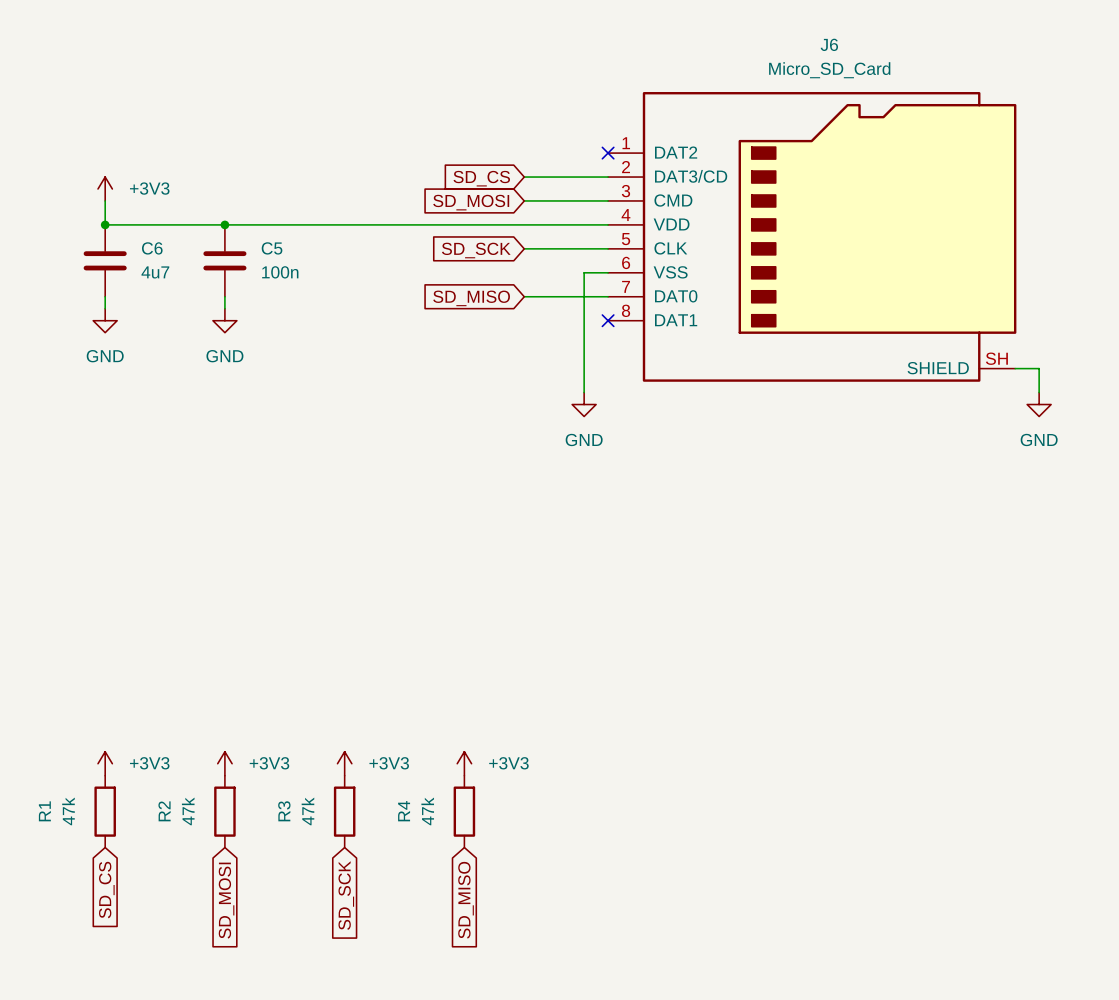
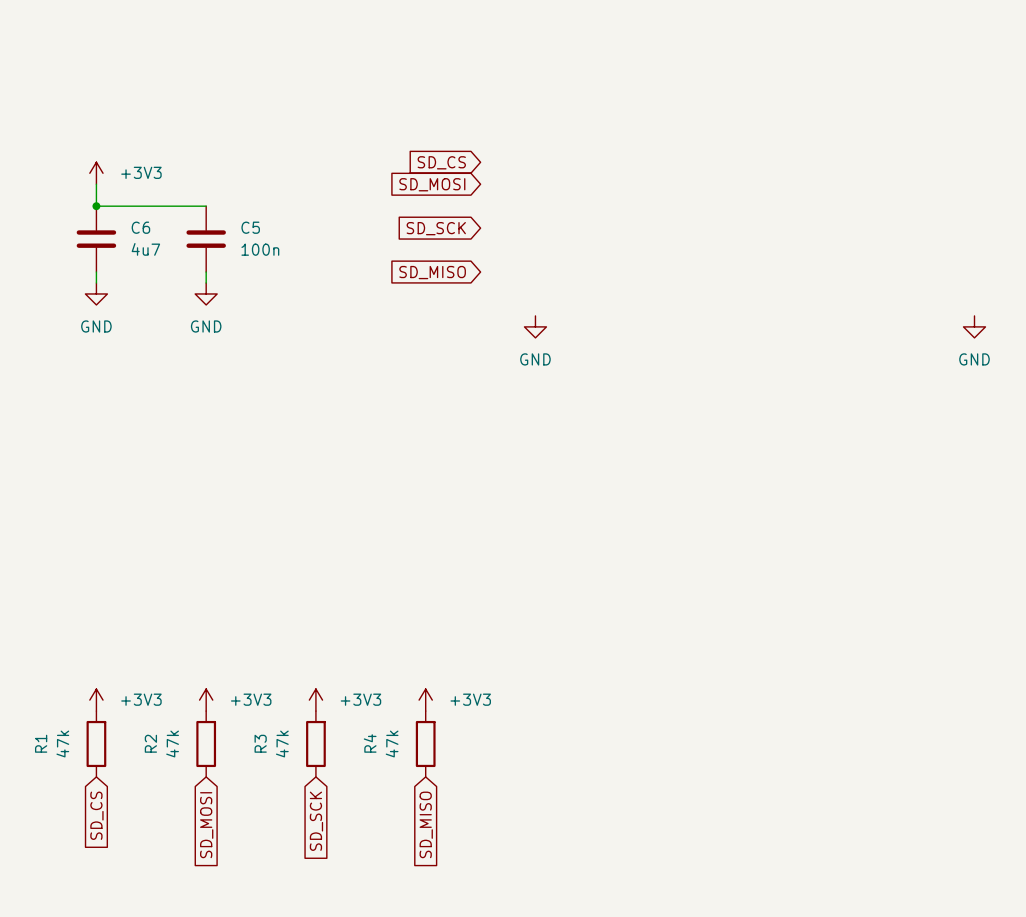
no-connect mark: (608, 153) -> none
wire: (524, 177) (608, 177) -> none
wire: (524, 200) (608, 200) -> none
wire: (224, 224) (608, 224) -> none
junction: (224, 224) -> none
J6: Micro_SD_Card (812, 236) -> none
wire: (524, 248) (608, 248) -> none
wire: (608, 272) (584, 272) (584, 392) -> none
wire: (524, 296) (608, 296) -> none
no-connect mark: (608, 320) -> none
wire: (1015, 368) (1039, 368) (1039, 392) -> none
power symbol position: GND (584, 404) -> GND (535, 326)
power symbol position: GND (1039, 404) -> GND (974, 326)

